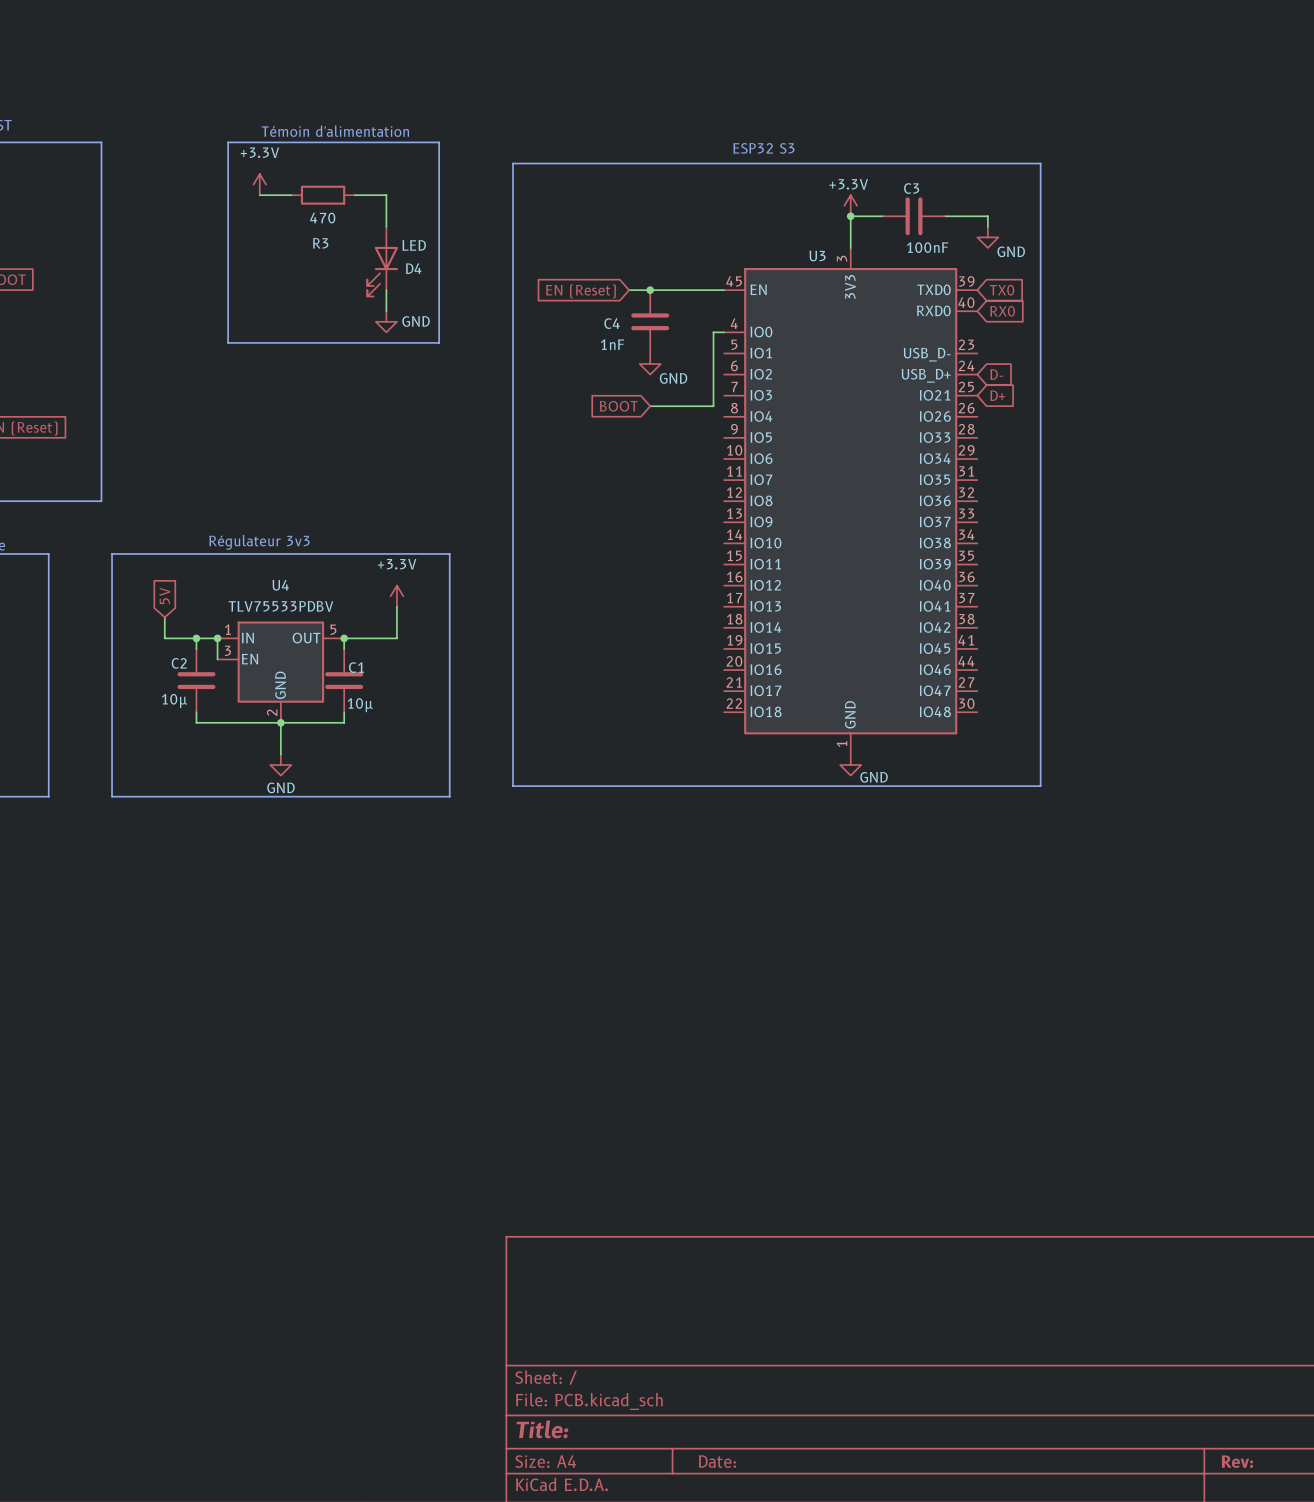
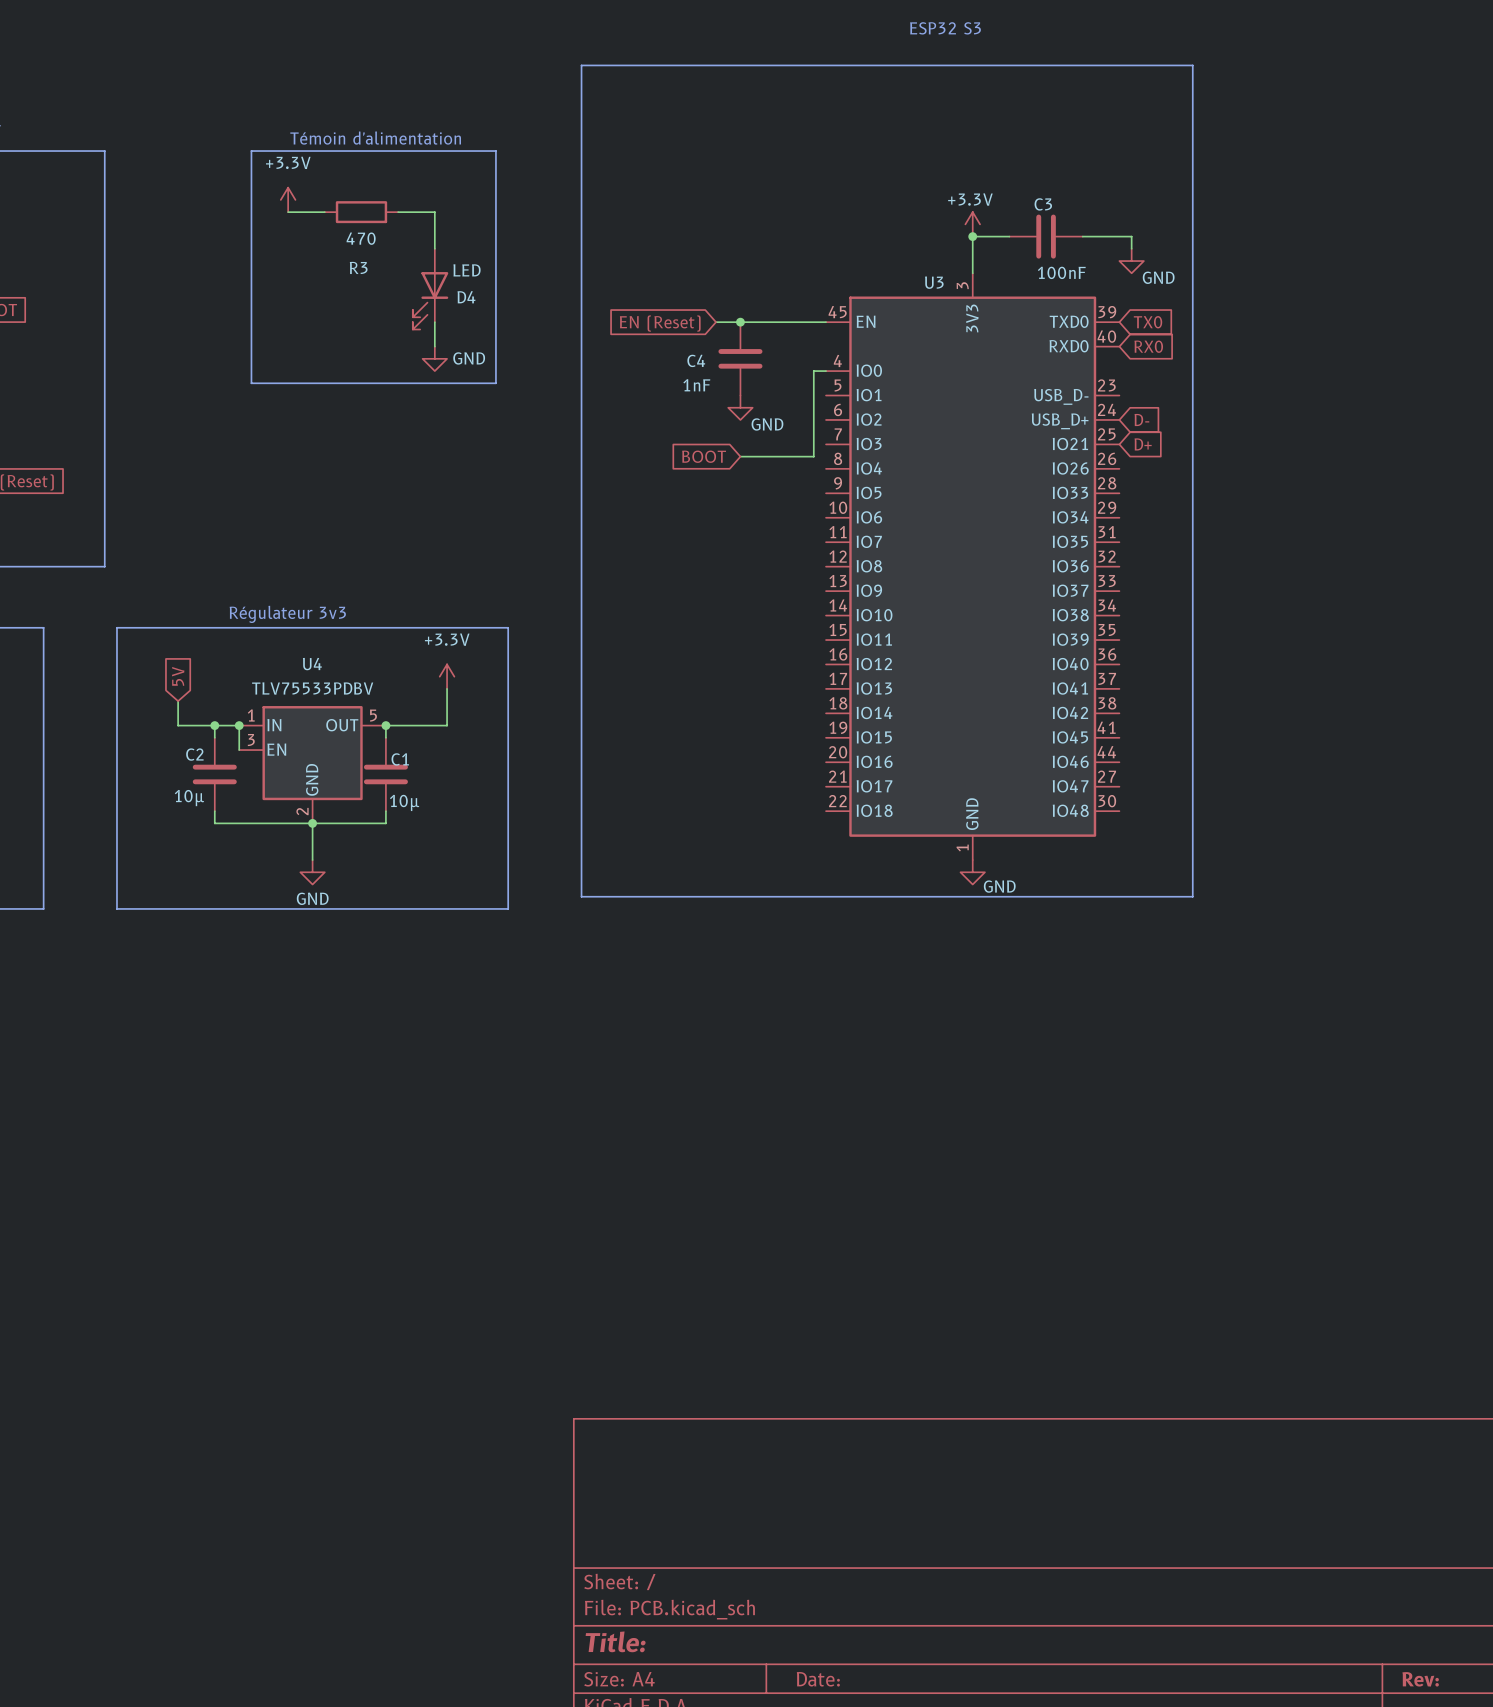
text position: ESP32 S3 (763, 148) -> ESP32 S3 (945, 28)
line: (513, 163) (1040, 163) -> (581, 175) (581, 65) (1192, 65) (1192, 175)

